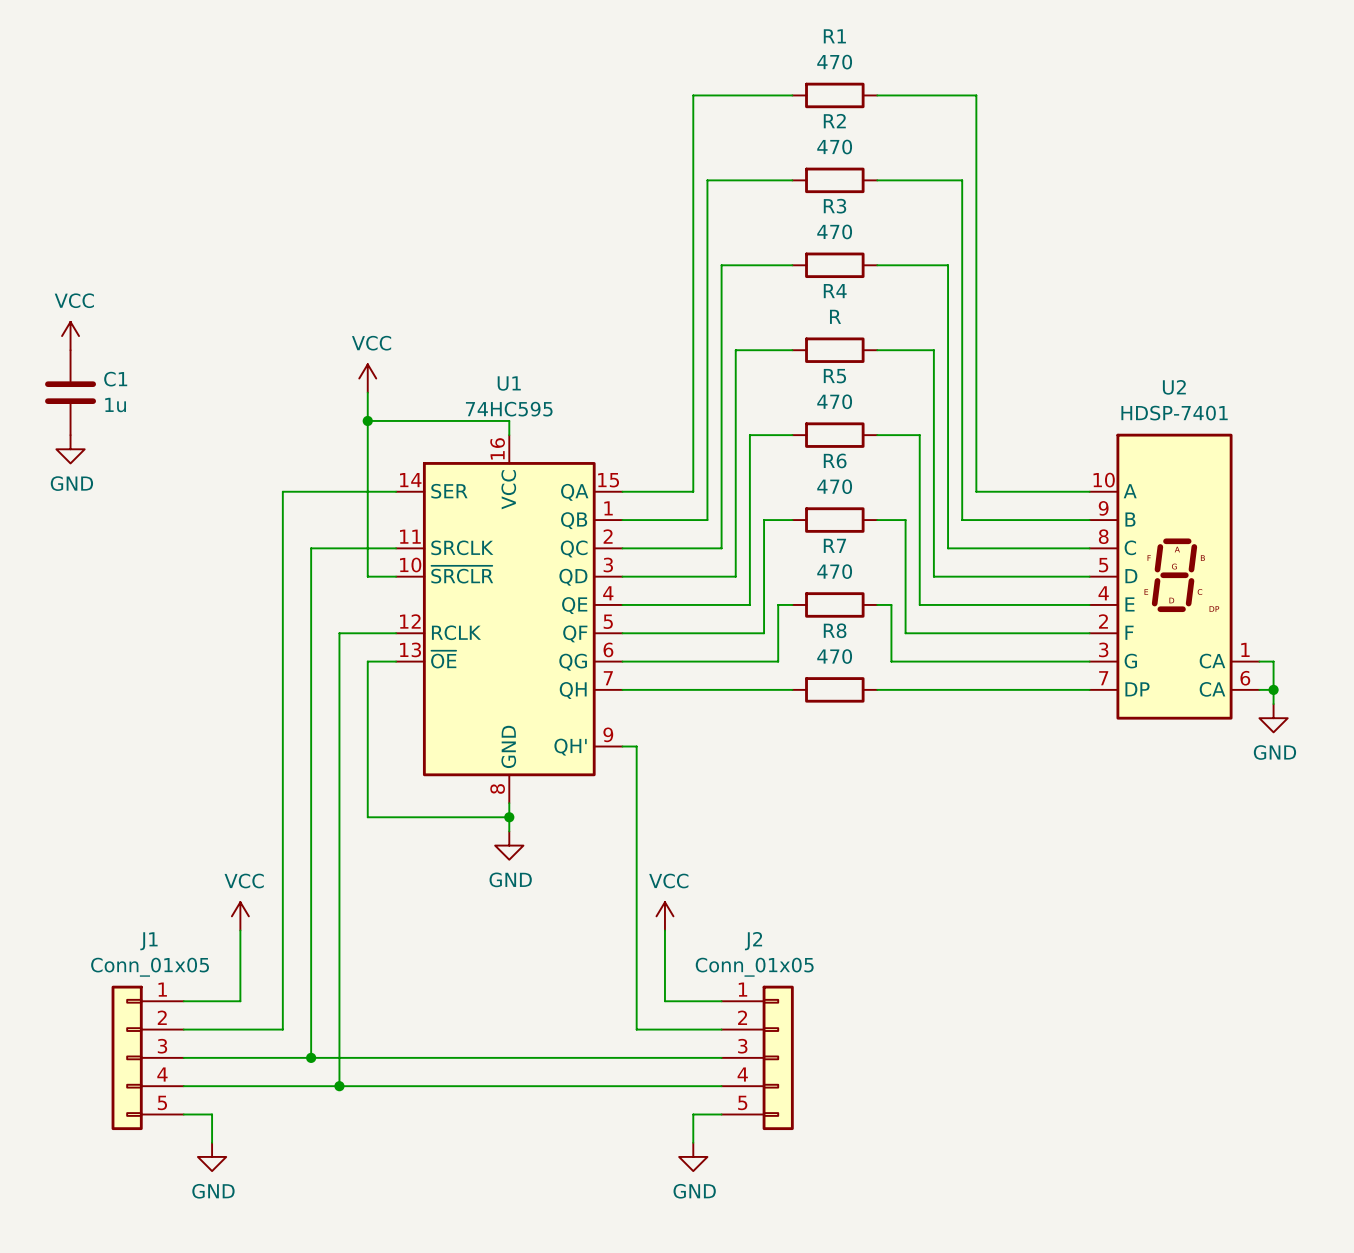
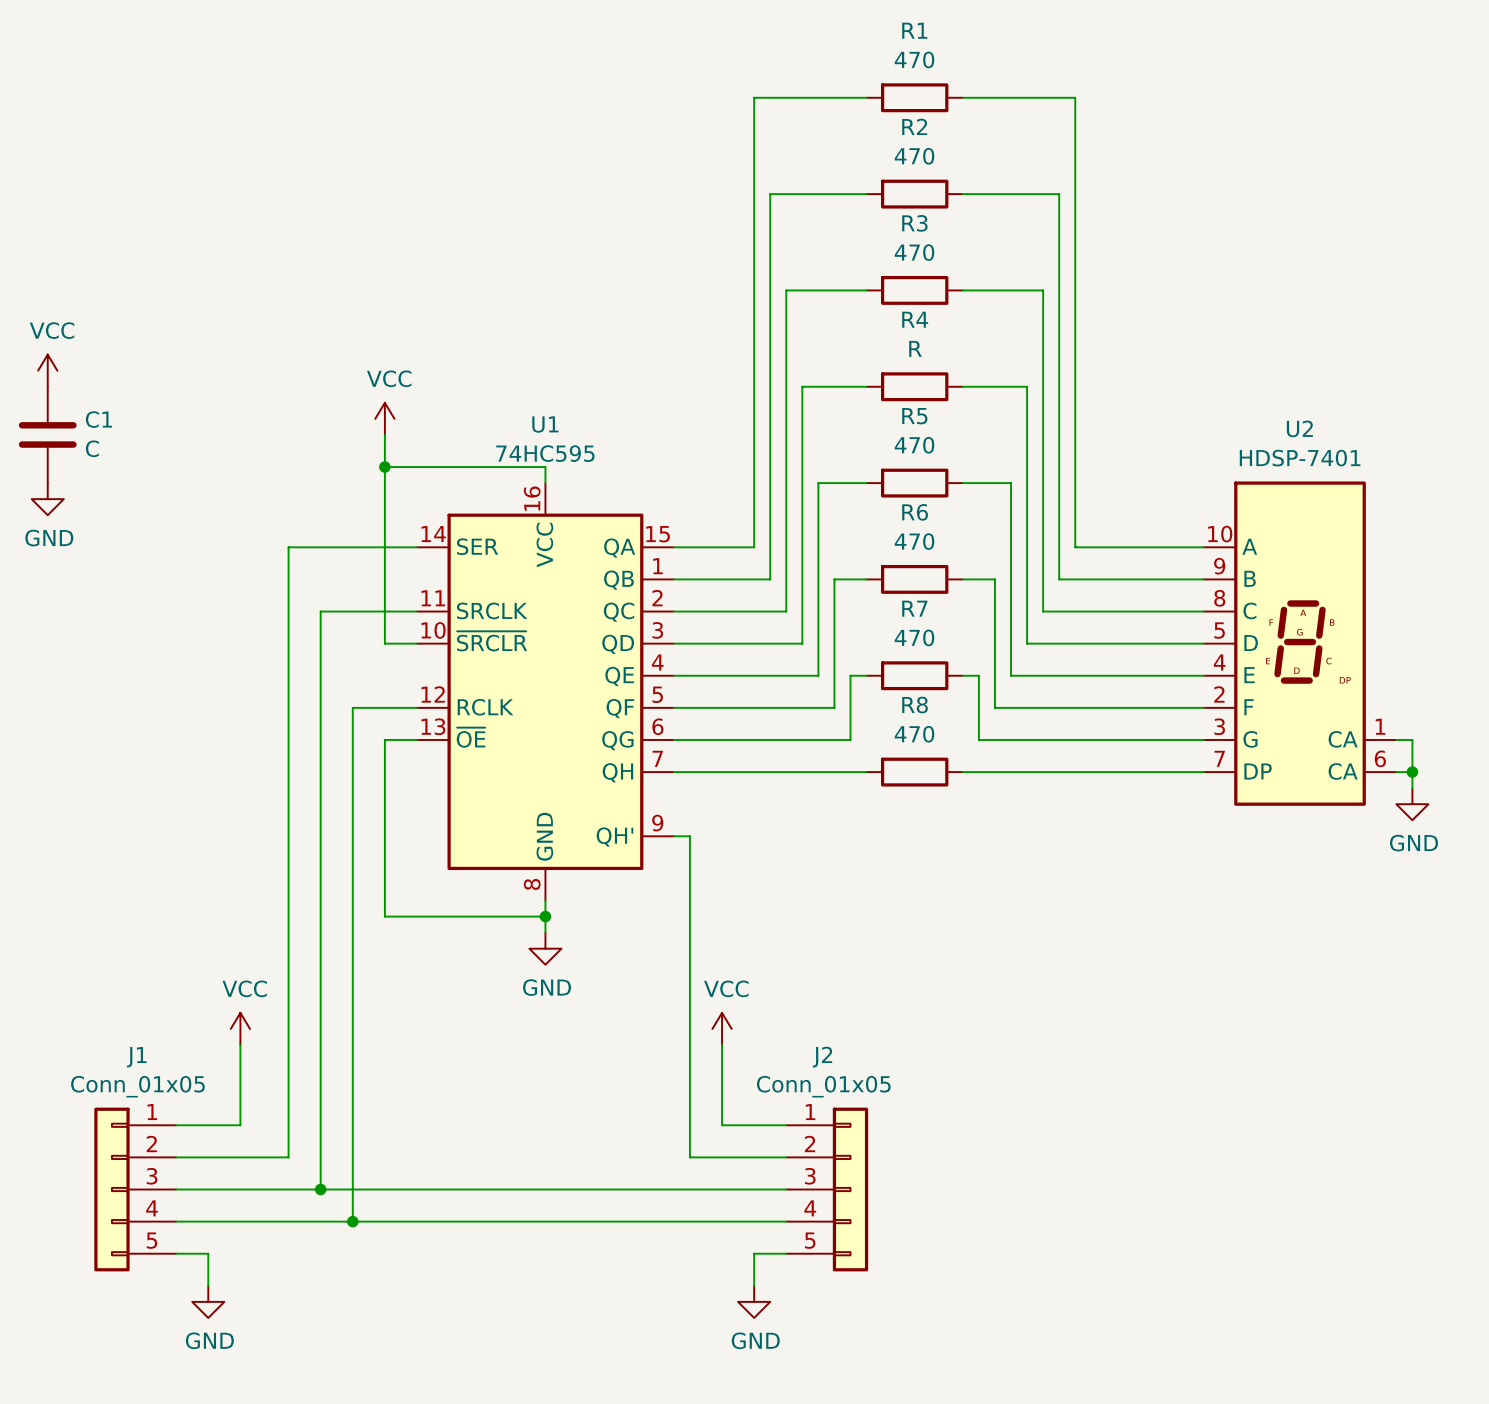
C1 value: 1u (115, 405) -> C (92, 448)

